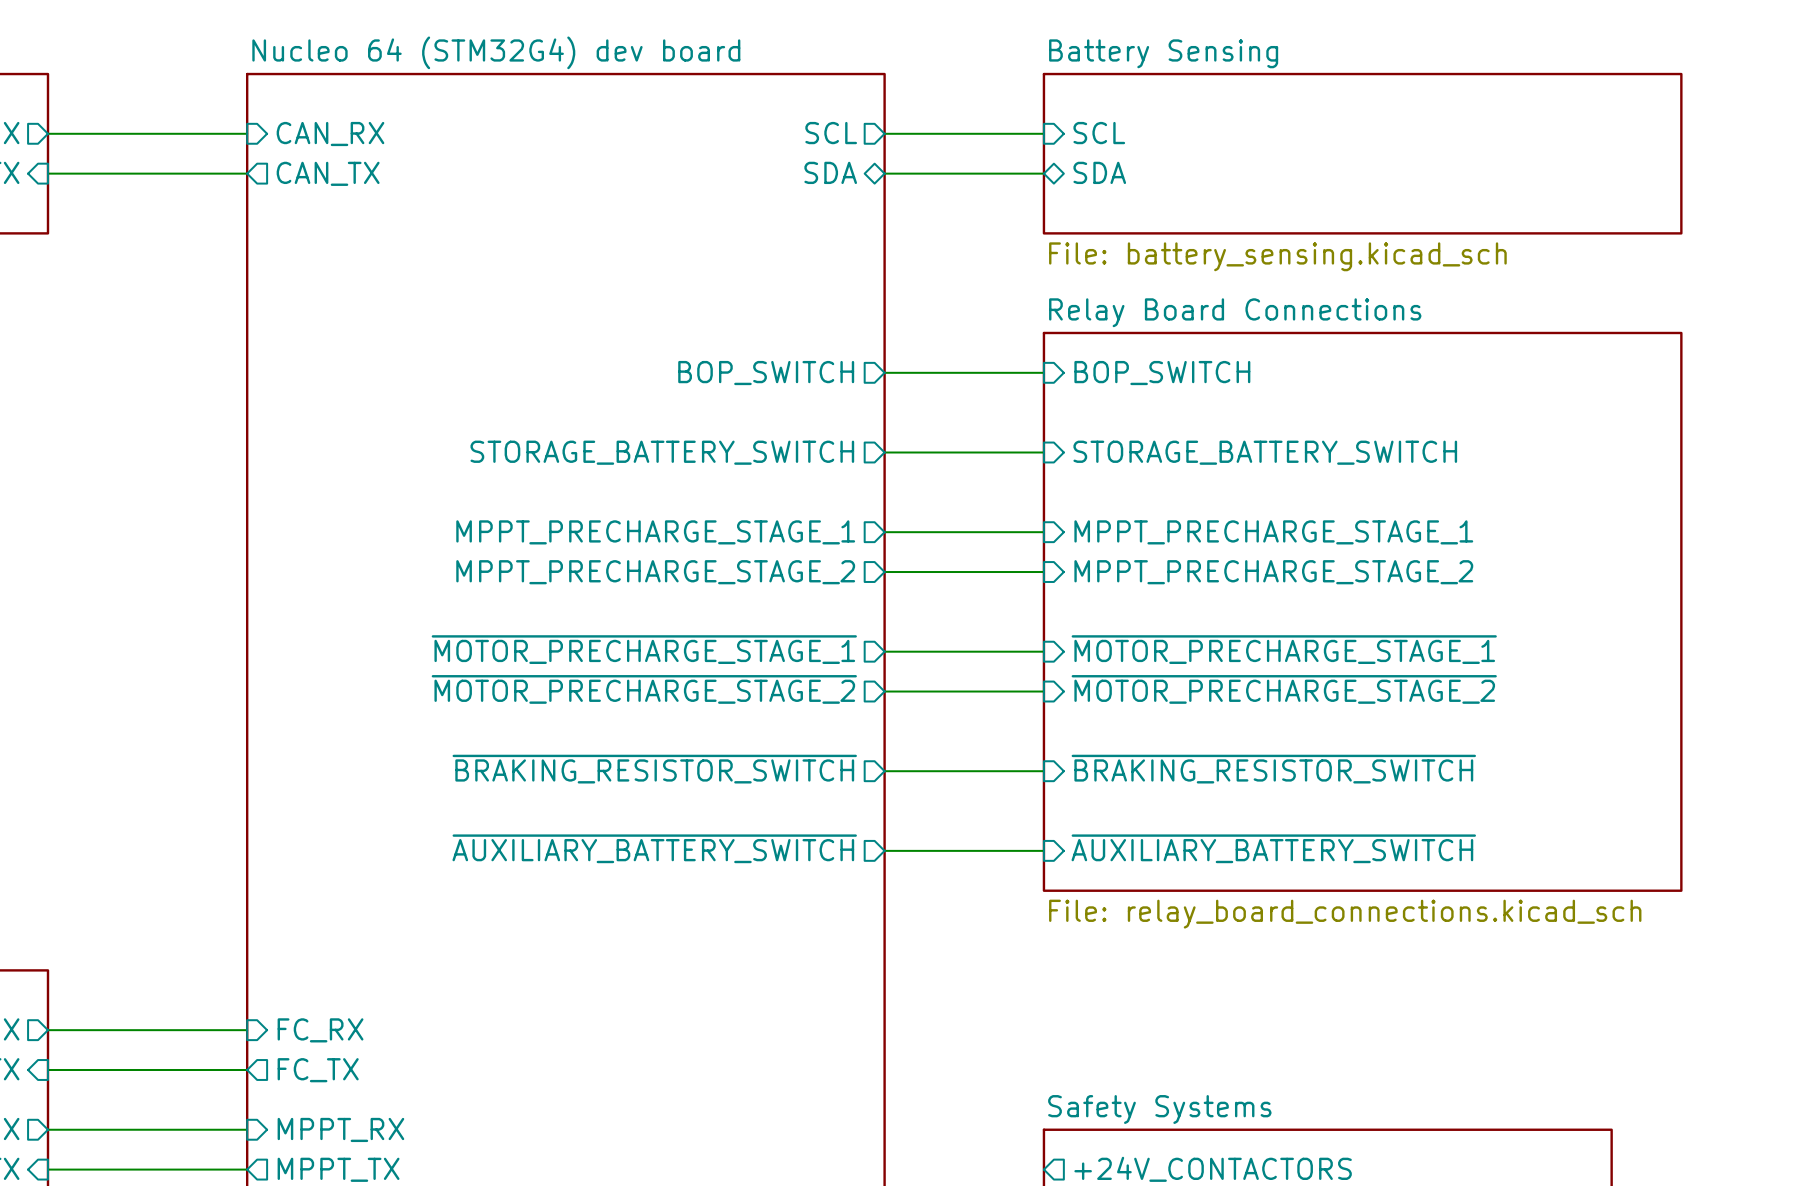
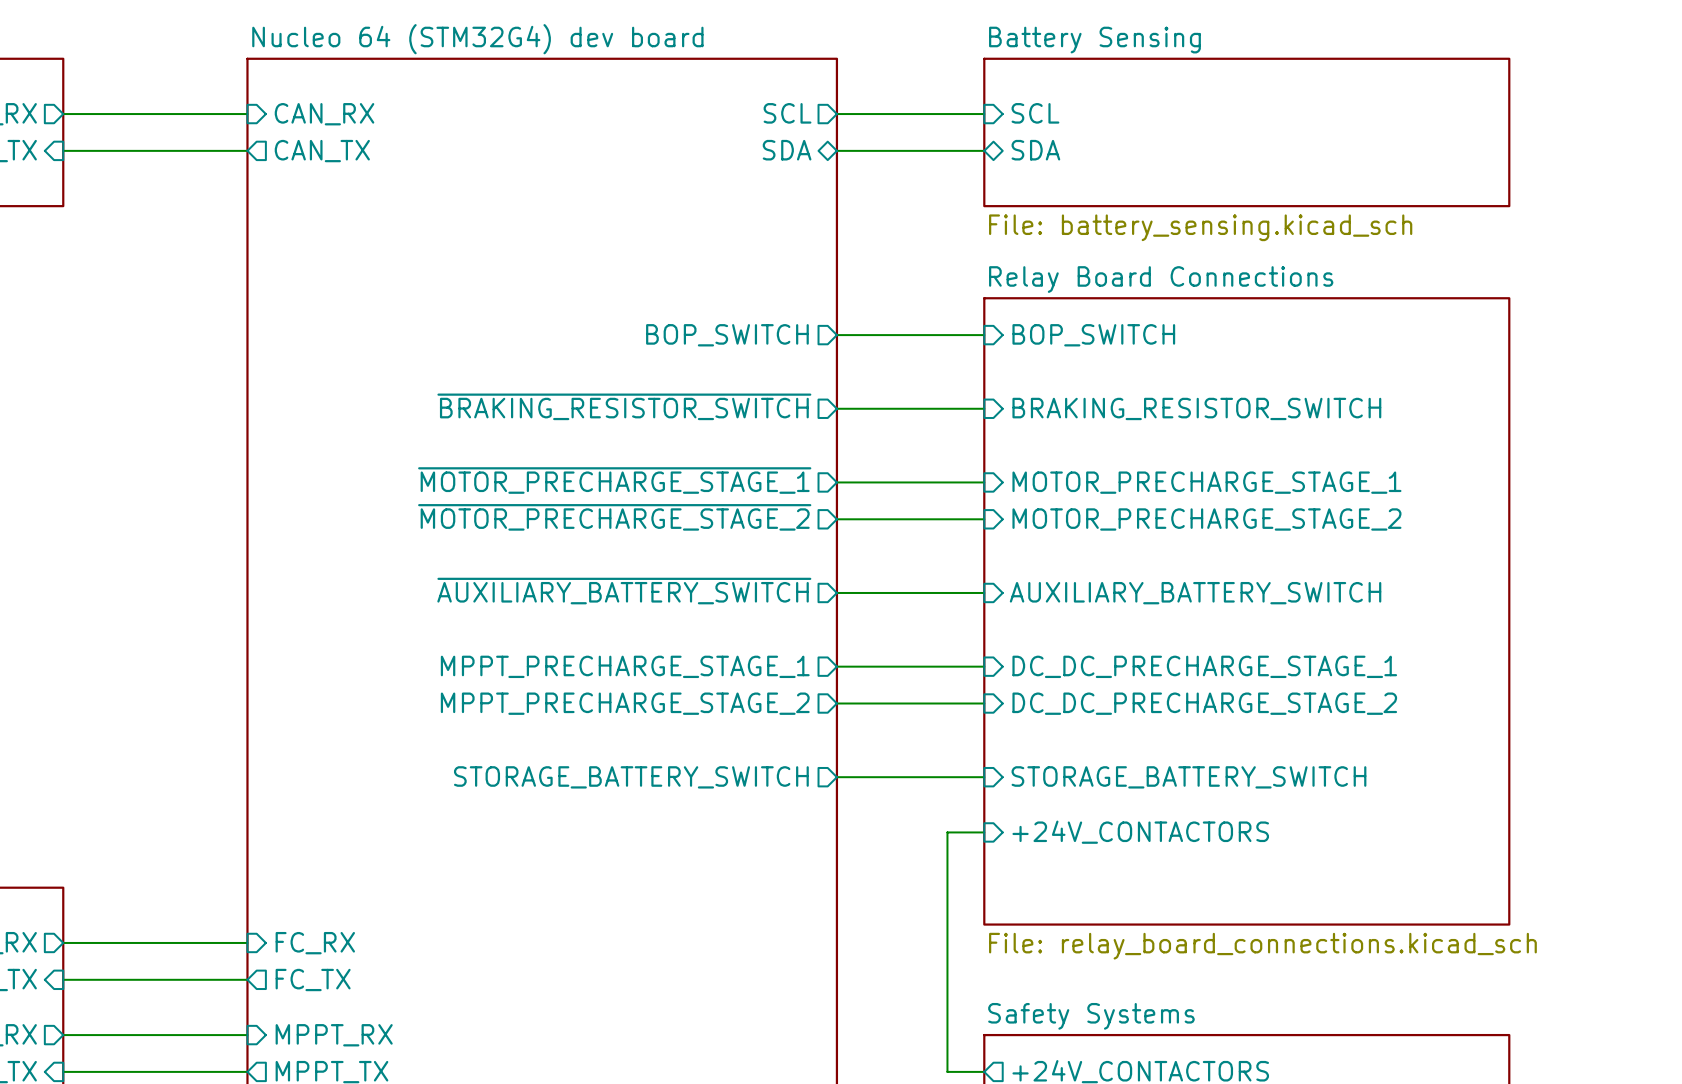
sheet Battery Sensing: none -> File: battery_sensing.kicad_sch (1246, 132)
sheet Battery Sensing: File: battery_sensing.kicad_sch (1362, 153) -> none
sheet pin: STORAGE_BATTERY_SWITCH (662, 452) -> ~{BRAKING_RESISTOR_SWITCH} (624, 406)
sheet pin: STORAGE_BATTERY_SWITCH (1265, 452) -> BRAKING_RESISTOR_SWITCH (1196, 408)
sheet pin: MPPT_PRECHARGE_STAGE_1 (655, 532) -> ~{MOTOR_PRECHARGE_STAGE_1} (614, 480)
sheet pin: MPPT_PRECHARGE_STAGE_1 (1273, 532) -> MOTOR_PRECHARGE_STAGE_1 (1206, 482)
sheet pin: MPPT_PRECHARGE_STAGE_2 (655, 572) -> ~{MOTOR_PRECHARGE_STAGE_2} (614, 517)
sheet pin: MPPT_PRECHARGE_STAGE_2 (1273, 572) -> MOTOR_PRECHARGE_STAGE_2 (1206, 519)
sheet Relay Board Connections: File: relay_board_connections.kicad_sch (1362, 611) -> none
sheet pin: ~{MOTOR_PRECHARGE_STAGE_1} (644, 649) -> ~{AUXILIARY_BATTERY_SWITCH} (624, 591)
sheet pin: ~{MOTOR_PRECHARGE_STAGE_1} (1284, 649) -> AUXILIARY_BATTERY_SWITCH (1195, 593)
sheet Relay Board Connections: none -> File: relay_board_connections.kicad_sch (1246, 611)
sheet pin: ~{MOTOR_PRECHARGE_STAGE_2} (644, 689) -> MPPT_PRECHARGE_STAGE_1 (625, 666)
sheet pin: ~{MOTOR_PRECHARGE_STAGE_2} (1284, 689) -> DC_DC_PRECHARGE_STAGE_1 (1204, 666)
wire: (884, 691) (1043, 691) -> (836, 666) (984, 666)
sheet pin: ~{BRAKING_RESISTOR_SWITCH} (654, 769) -> MPPT_PRECHARGE_STAGE_2 (625, 703)
sheet pin: ~{BRAKING_RESISTOR_SWITCH} (1273, 769) -> DC_DC_PRECHARGE_STAGE_2 (1204, 703)
sheet pin: ~{AUXILIARY_BATTERY_SWITCH} (654, 848) -> STORAGE_BATTERY_SWITCH (631, 777)
sheet pin: ~{AUXILIARY_BATTERY_SWITCH} (1273, 848) -> STORAGE_BATTERY_SWITCH (1188, 777)
wire: none -> (984, 832) (947, 832) (947, 1071) (984, 1071)
sheet pin: none -> +24V_CONTACTORS (1140, 832)

